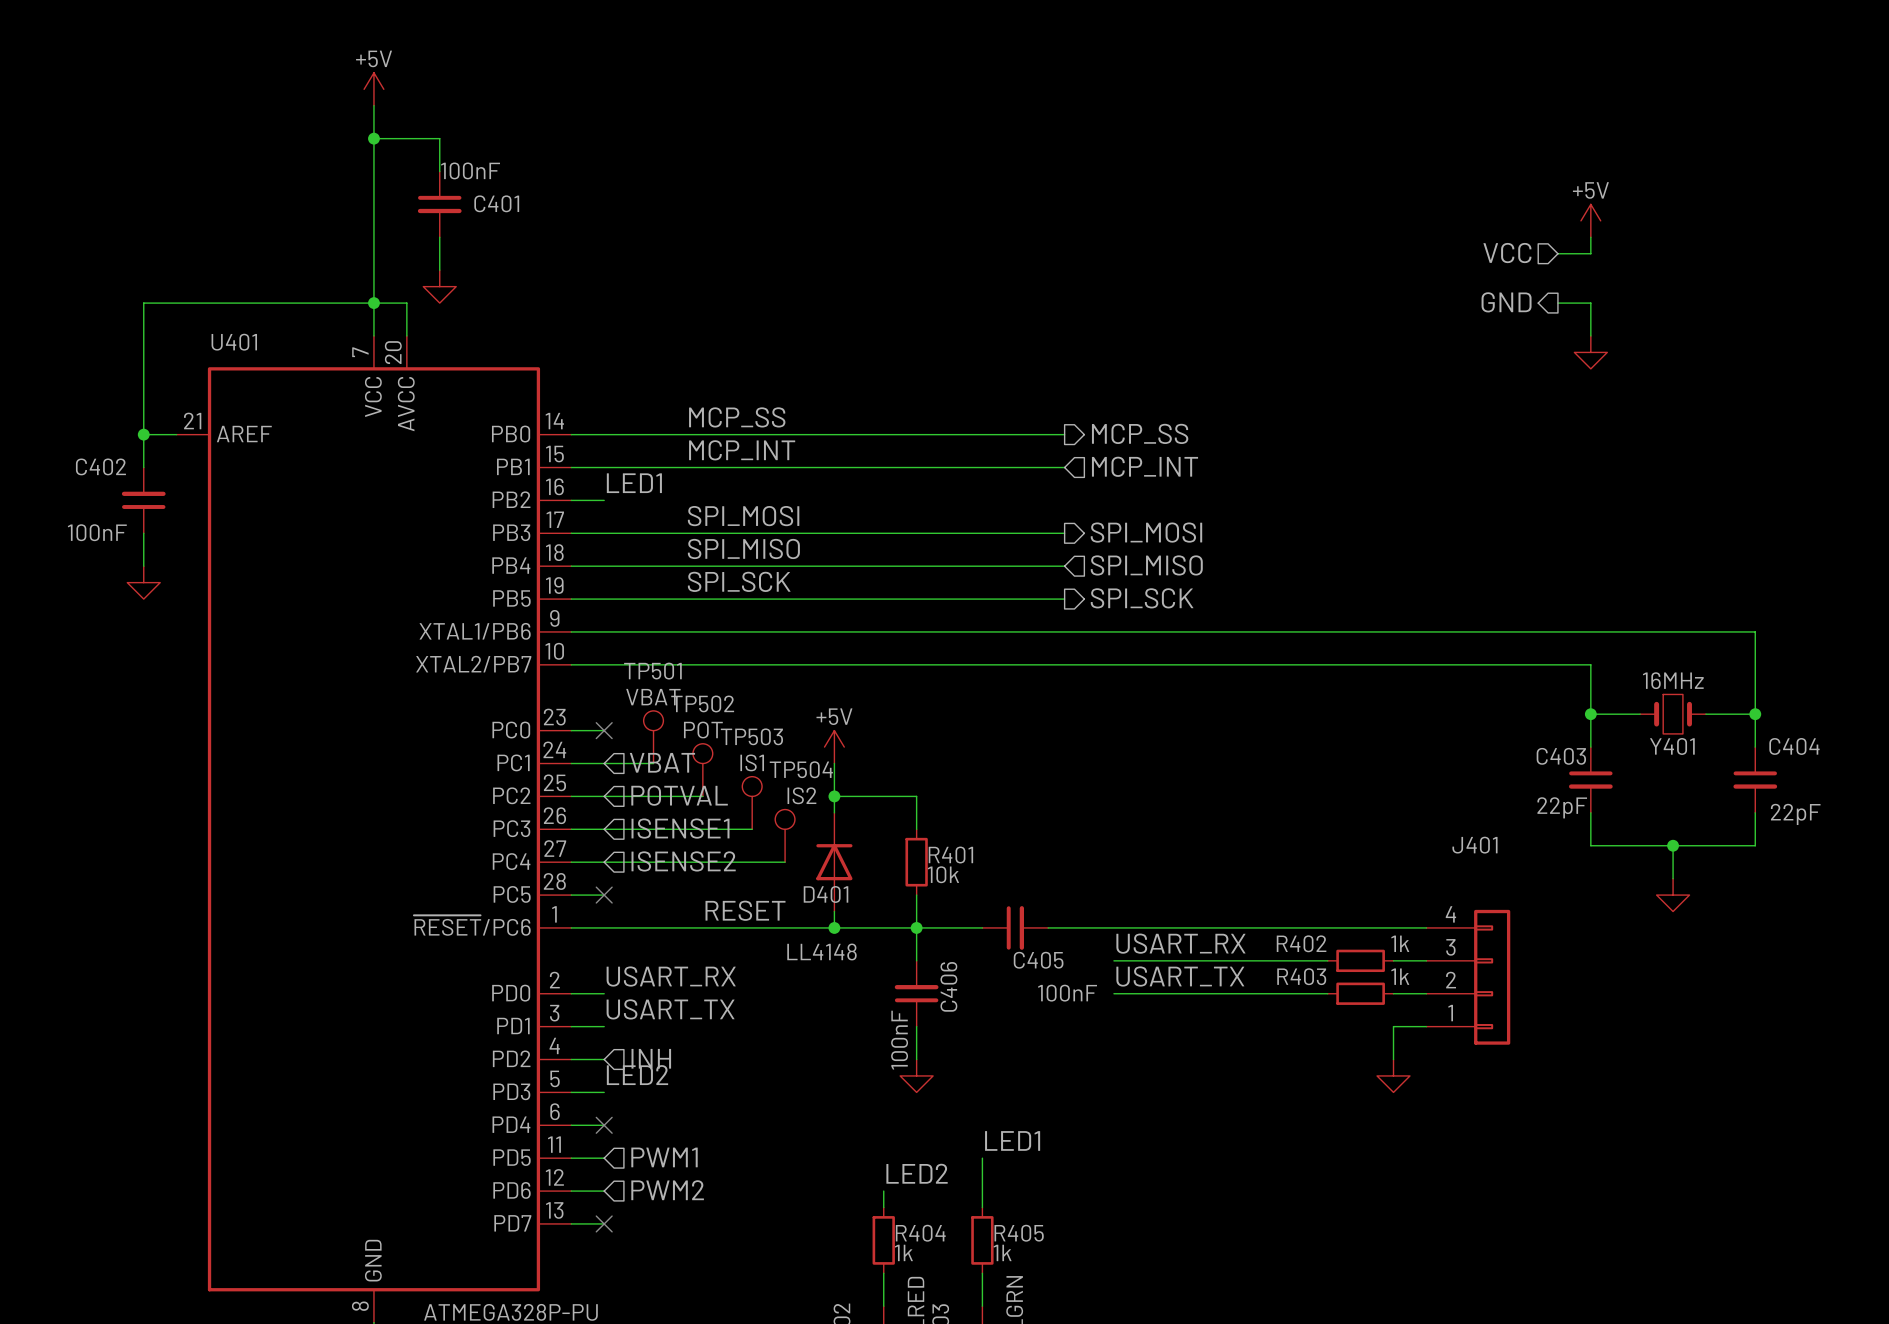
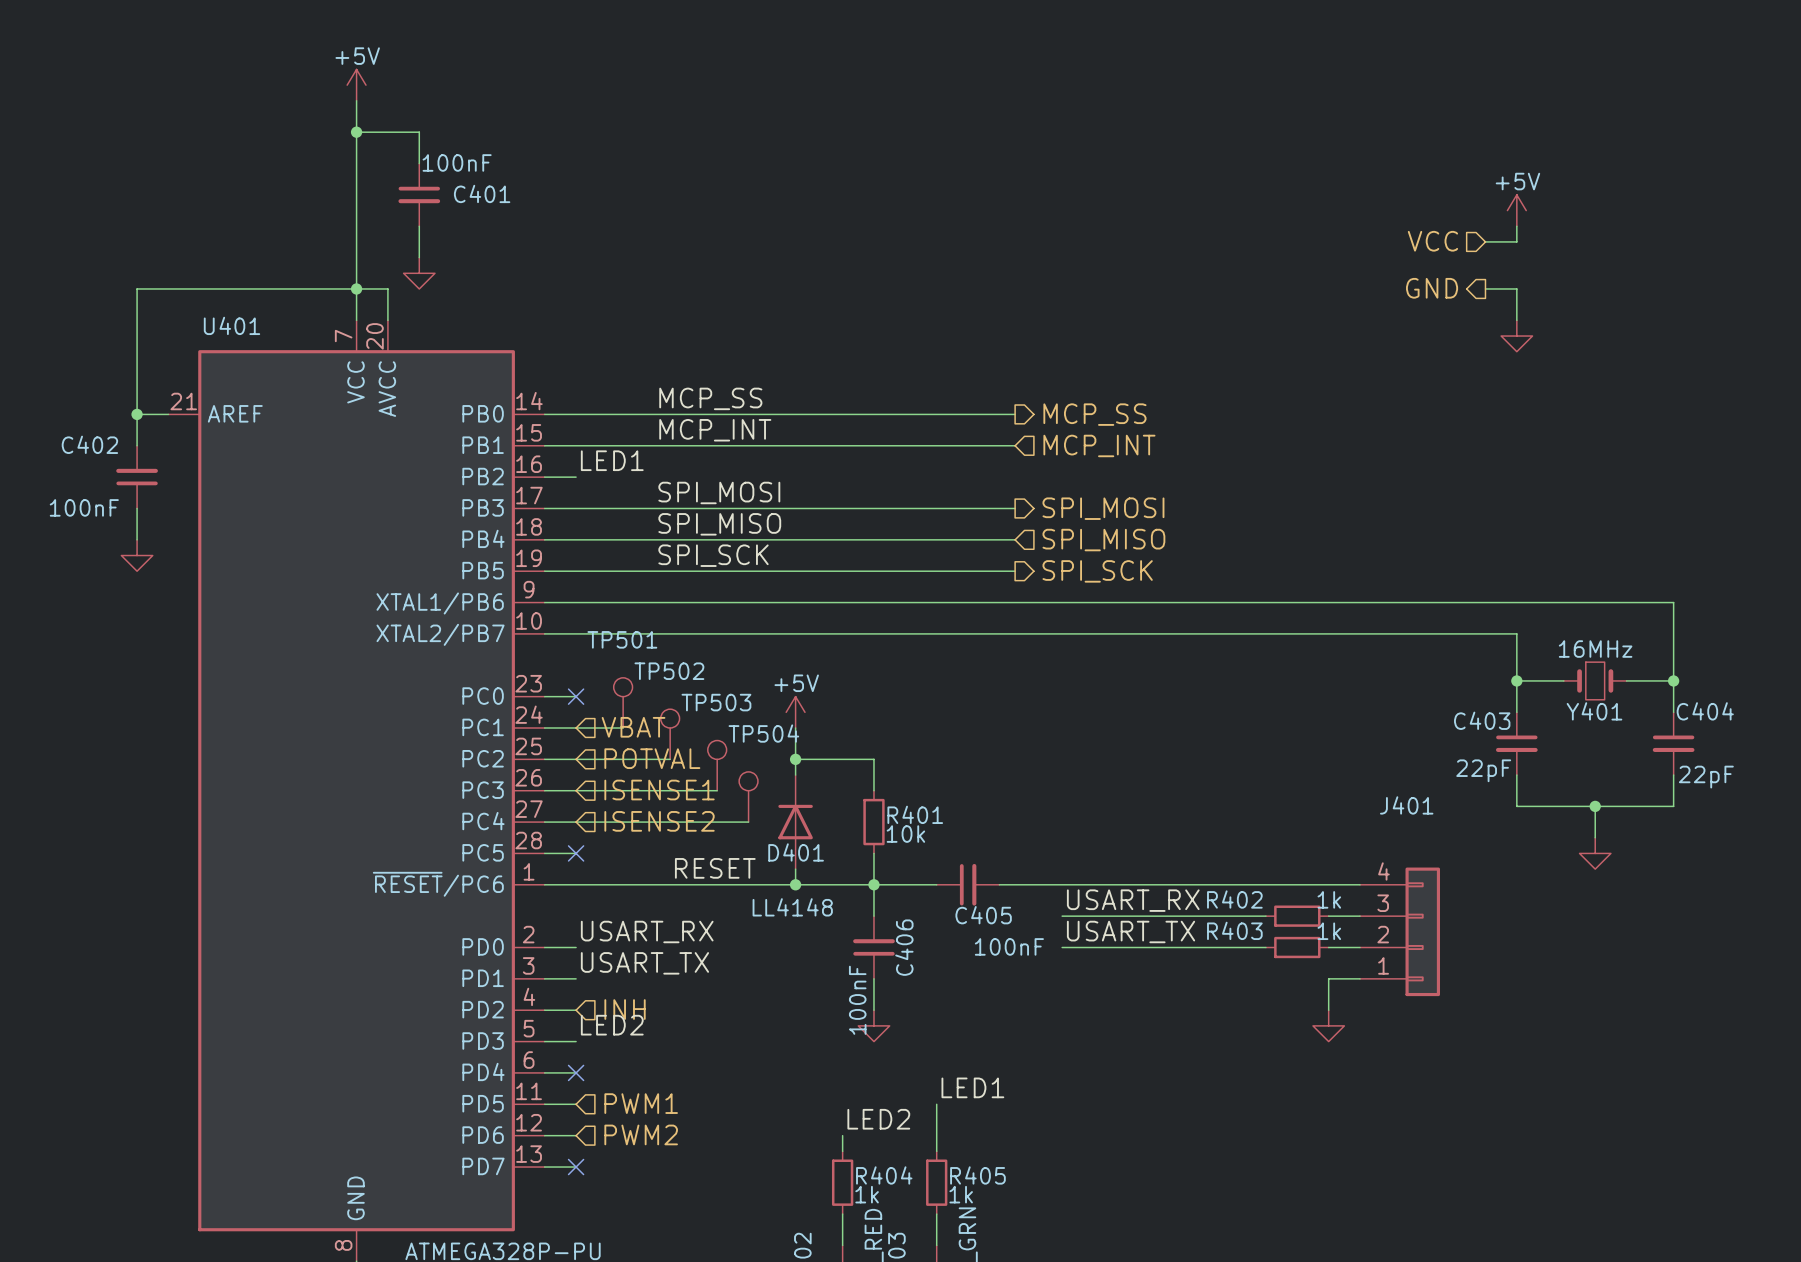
TP501 value: VBAT (653, 697) -> none
TP502 value: POT (703, 730) -> none
TP503 value: IS1 (752, 762) -> none
TP504 value: IS2 (801, 795) -> none

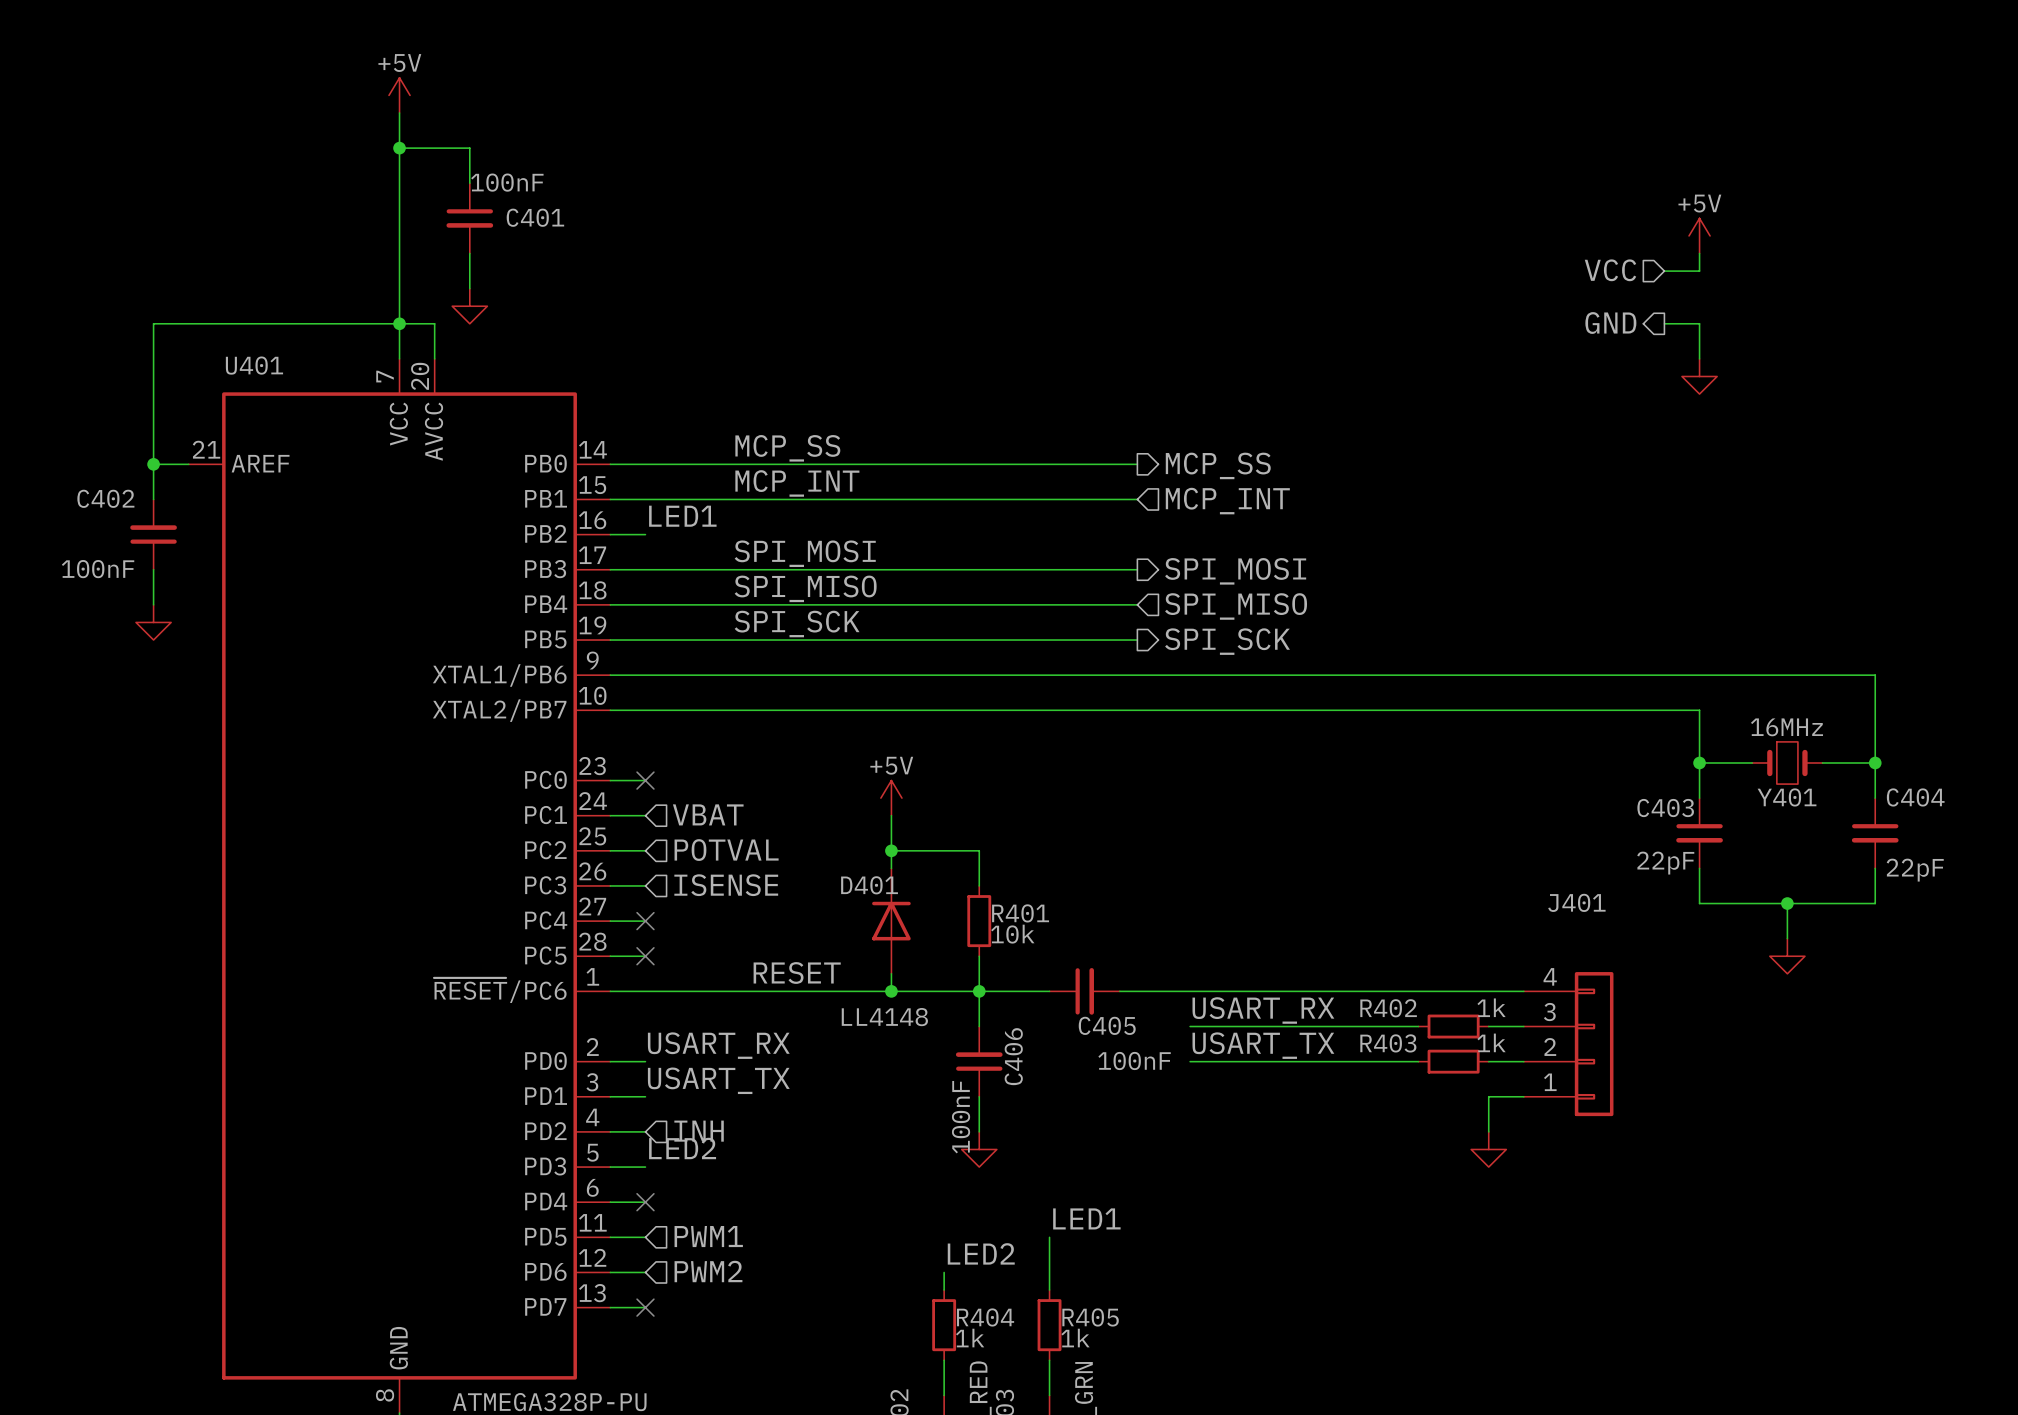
TP501: (623, 702) -> none
wire: (576, 728) (623, 728) -> none
TP502: (670, 734) -> none
wire: (576, 759) (670, 759) -> none
TP503: (717, 765) -> none
wire: (576, 790) (717, 790) -> none
hierarchical label: ISENSE1 (659, 790) -> ISENSE (726, 885)
TP504: (748, 796) -> none
hierarchical label: ISENSE2 (659, 821) -> none
wire: (576, 822) (748, 822) -> none
no-connect mark: none -> (645, 921)
D401 name position: D401 (796, 852) -> D401 (869, 885)

